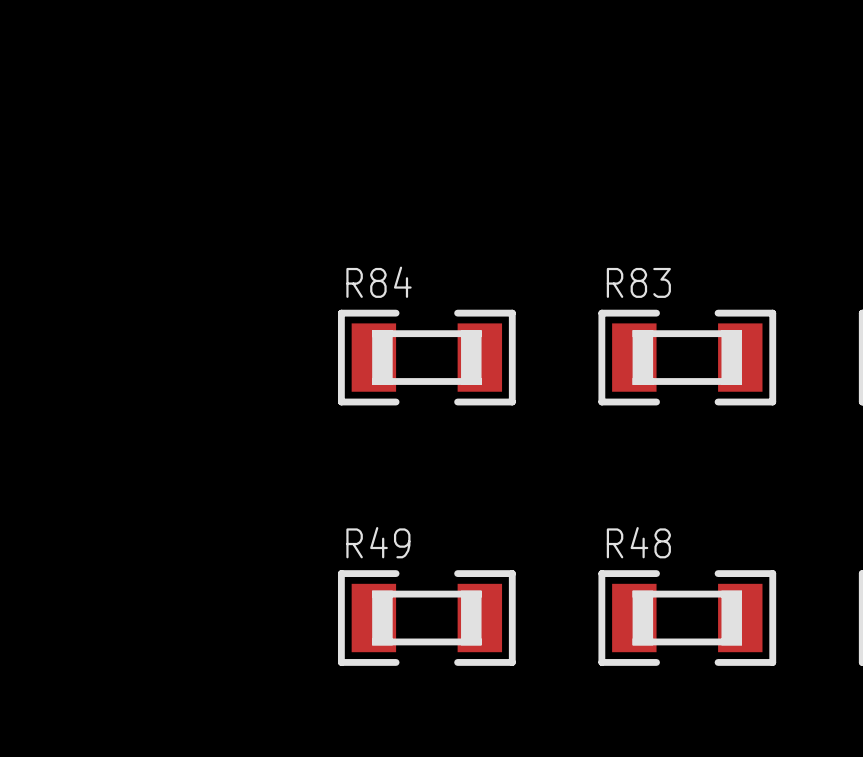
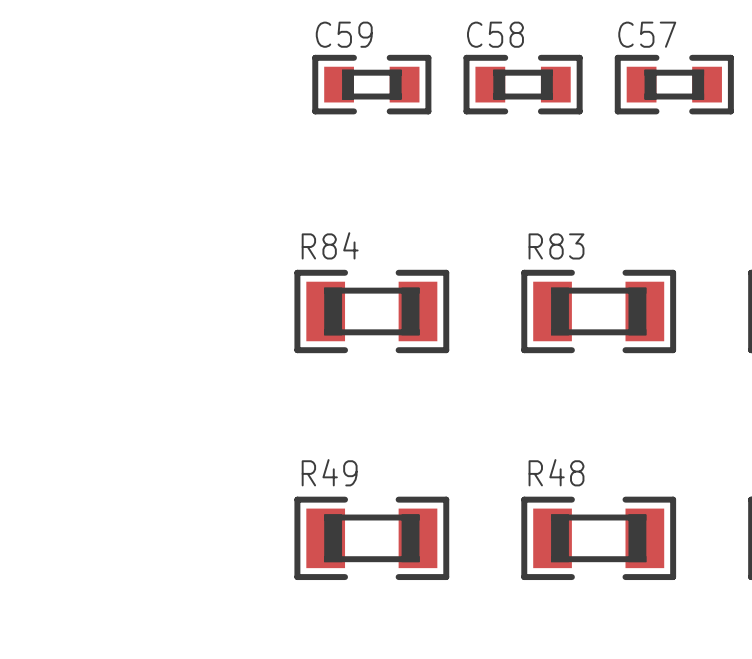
C59: none -> (371, 84)
C58: none -> (523, 84)
C57: none -> (674, 84)

